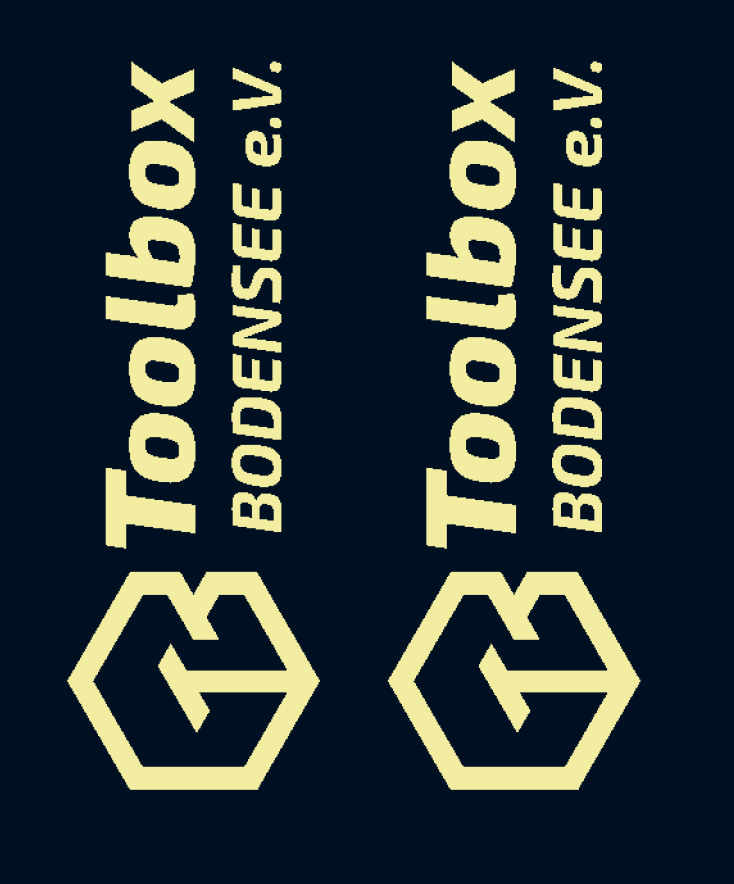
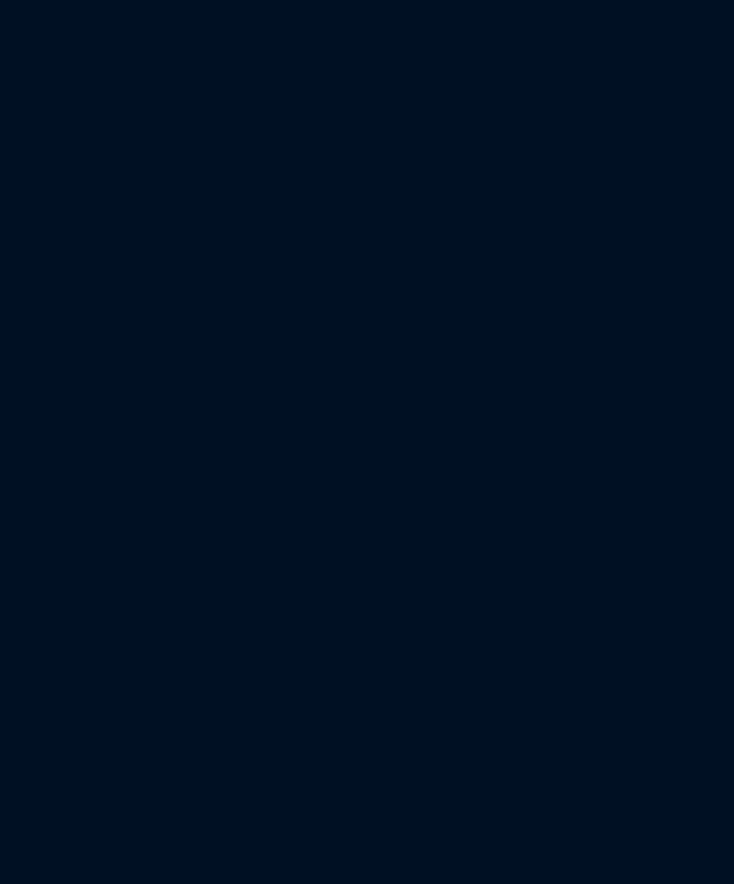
drawing: [67, 61, 320, 790] -> none
drawing: [387, 61, 641, 790] -> none

